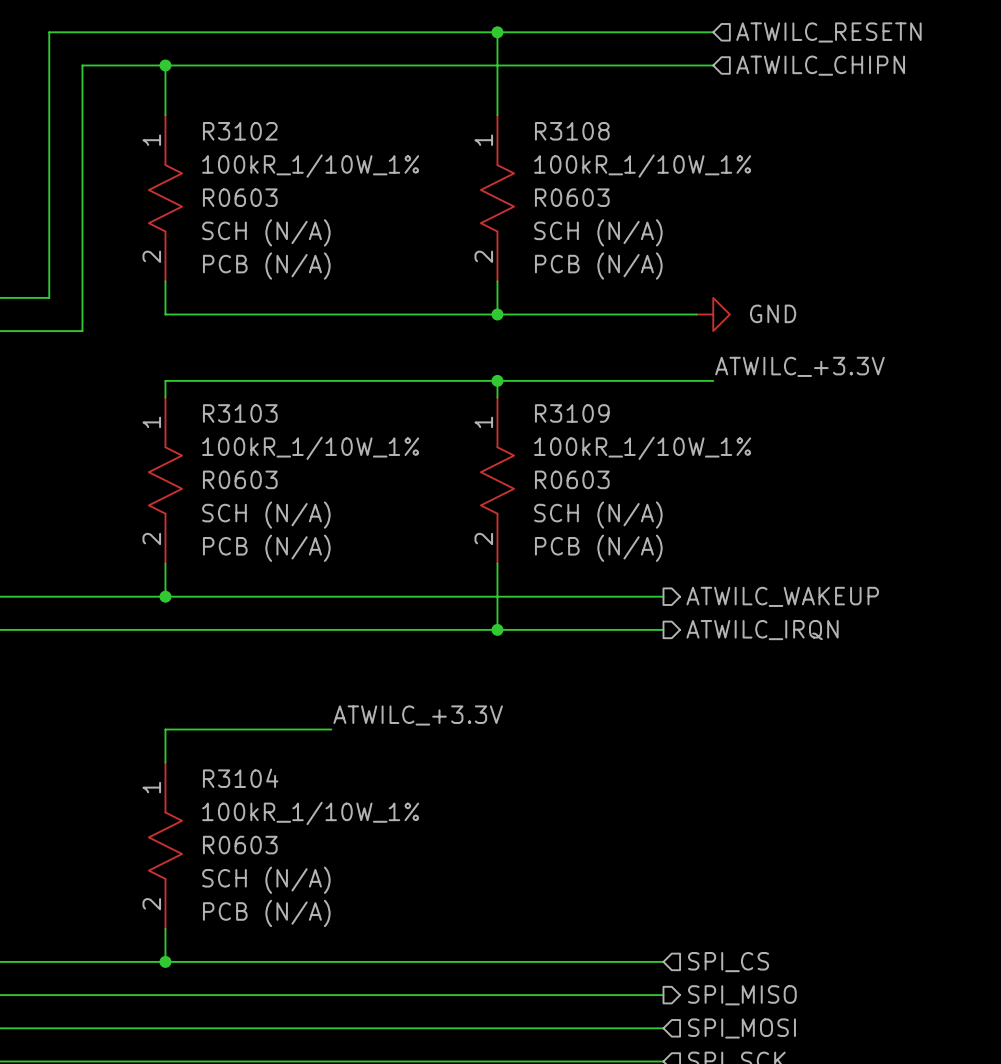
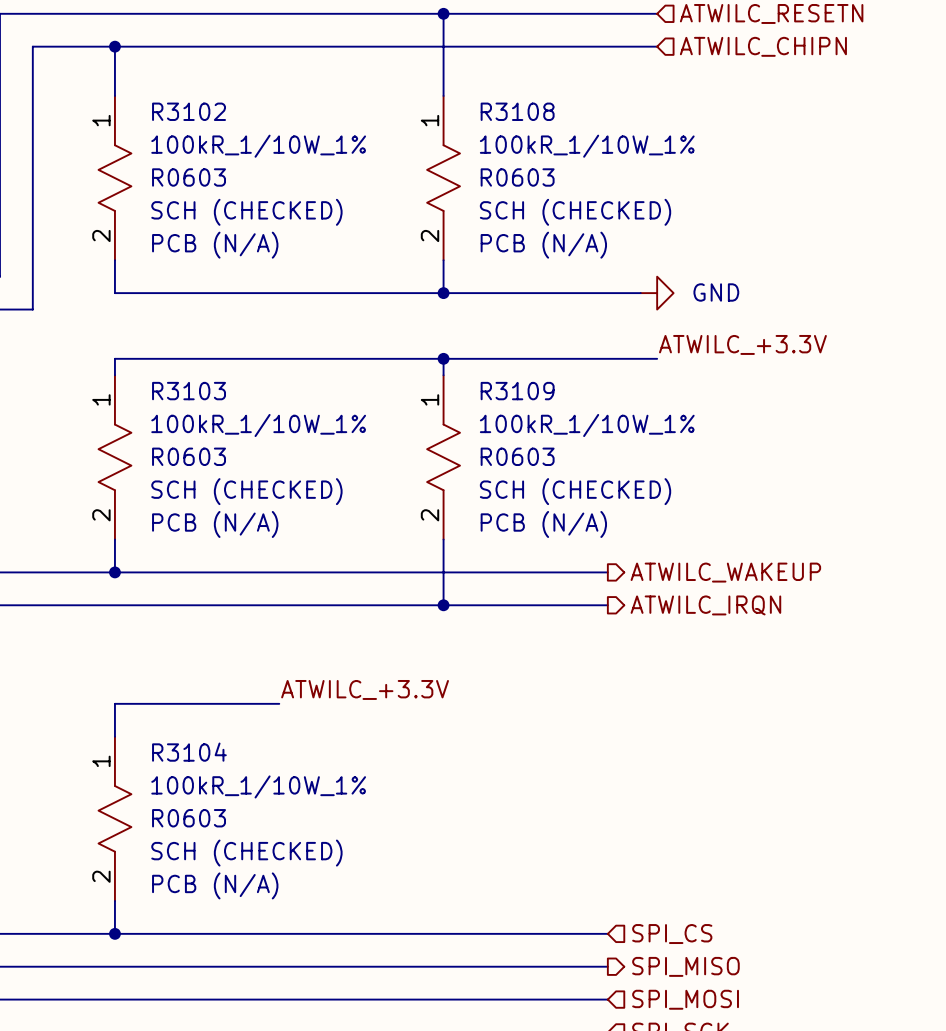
R3102 text: SCH (N/A) (266, 232) -> SCH (CHECKED) (246, 212)
R3108 text: SCH (N/A) (598, 232) -> SCH (CHECKED) (575, 212)
R3103 text: SCH (N/A) (266, 515) -> SCH (CHECKED) (246, 491)
R3109 text: SCH (N/A) (598, 515) -> SCH (CHECKED) (575, 491)
R3104 text: SCH (N/A) (266, 880) -> SCH (CHECKED) (246, 853)

